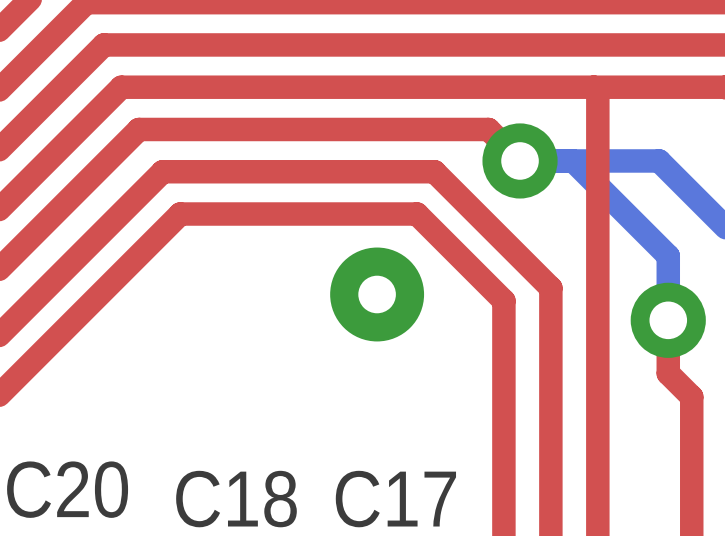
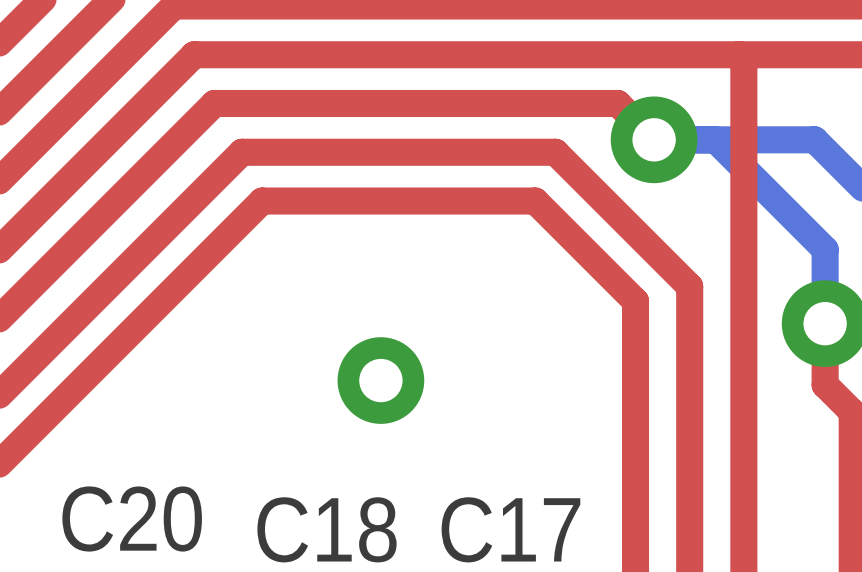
via: (377, 294) -> none
via: none -> (380, 380)

